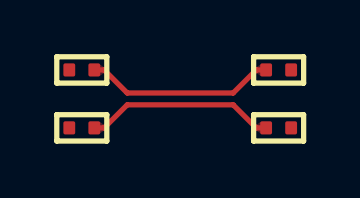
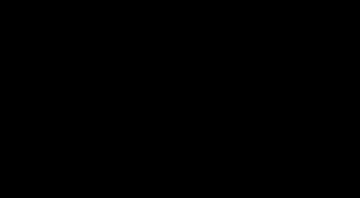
part: (81, 69) -> none
top track: (94, 69) (104, 69) (127, 92) (233, 92) (256, 69) (266, 69) -> none
part: (278, 69) -> none
part: (81, 127) -> none
top track: (94, 127) (104, 127) (127, 104) (233, 104) (256, 127) (266, 127) -> none
part: (278, 127) -> none

